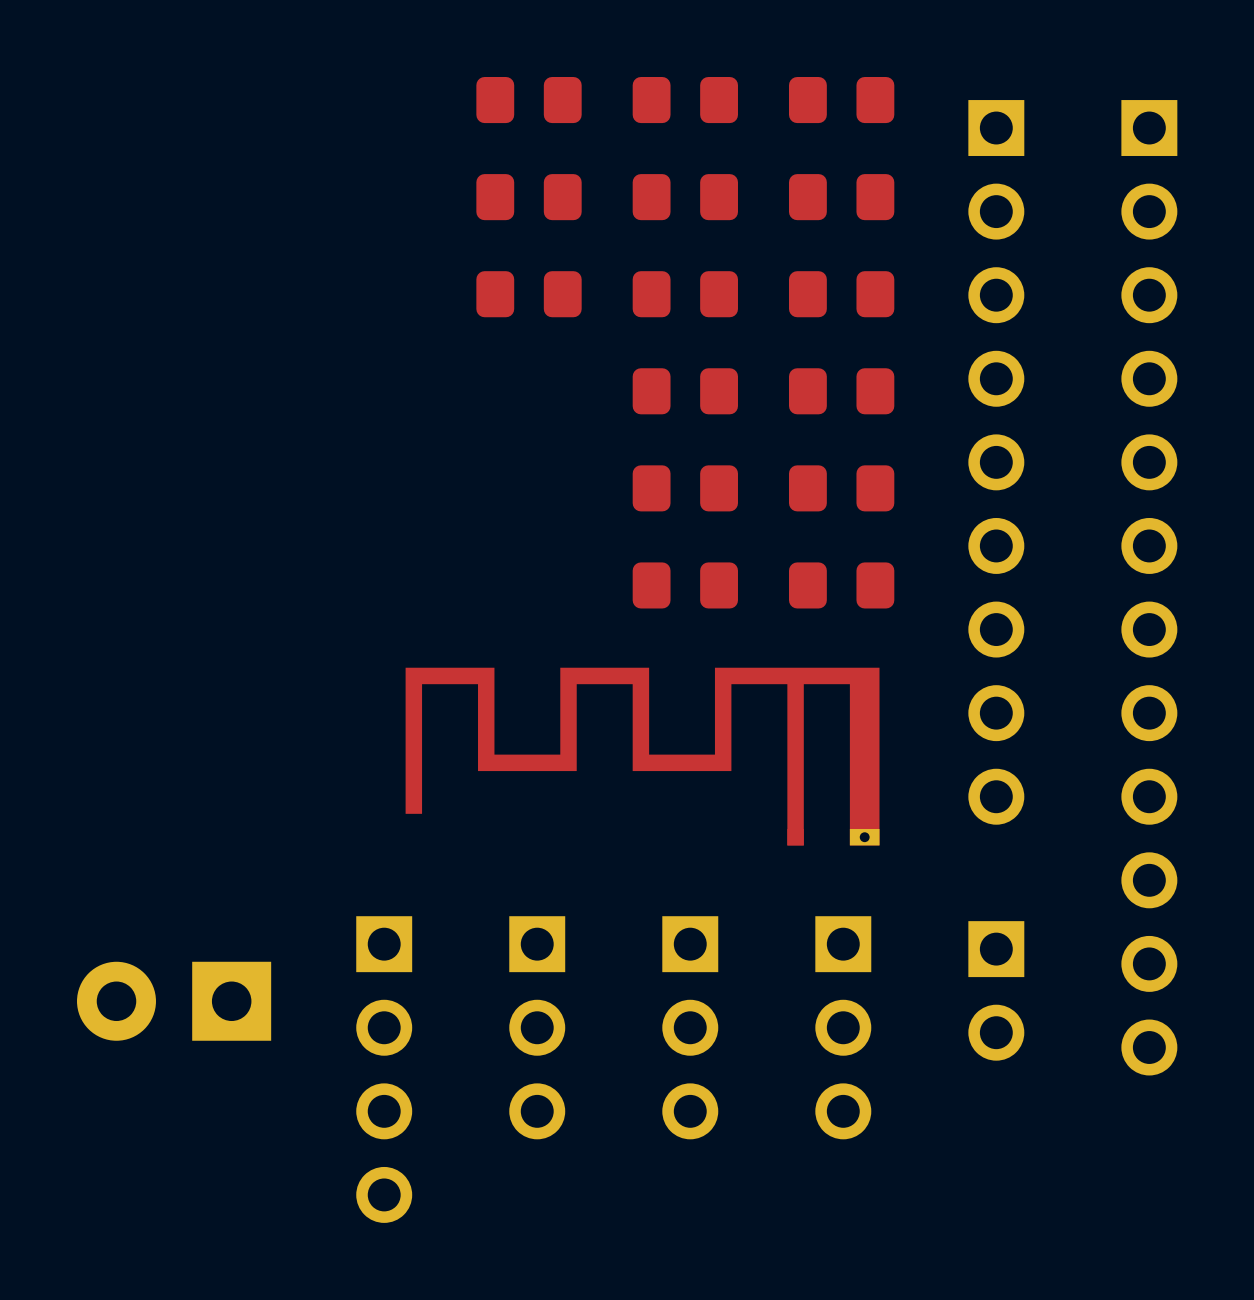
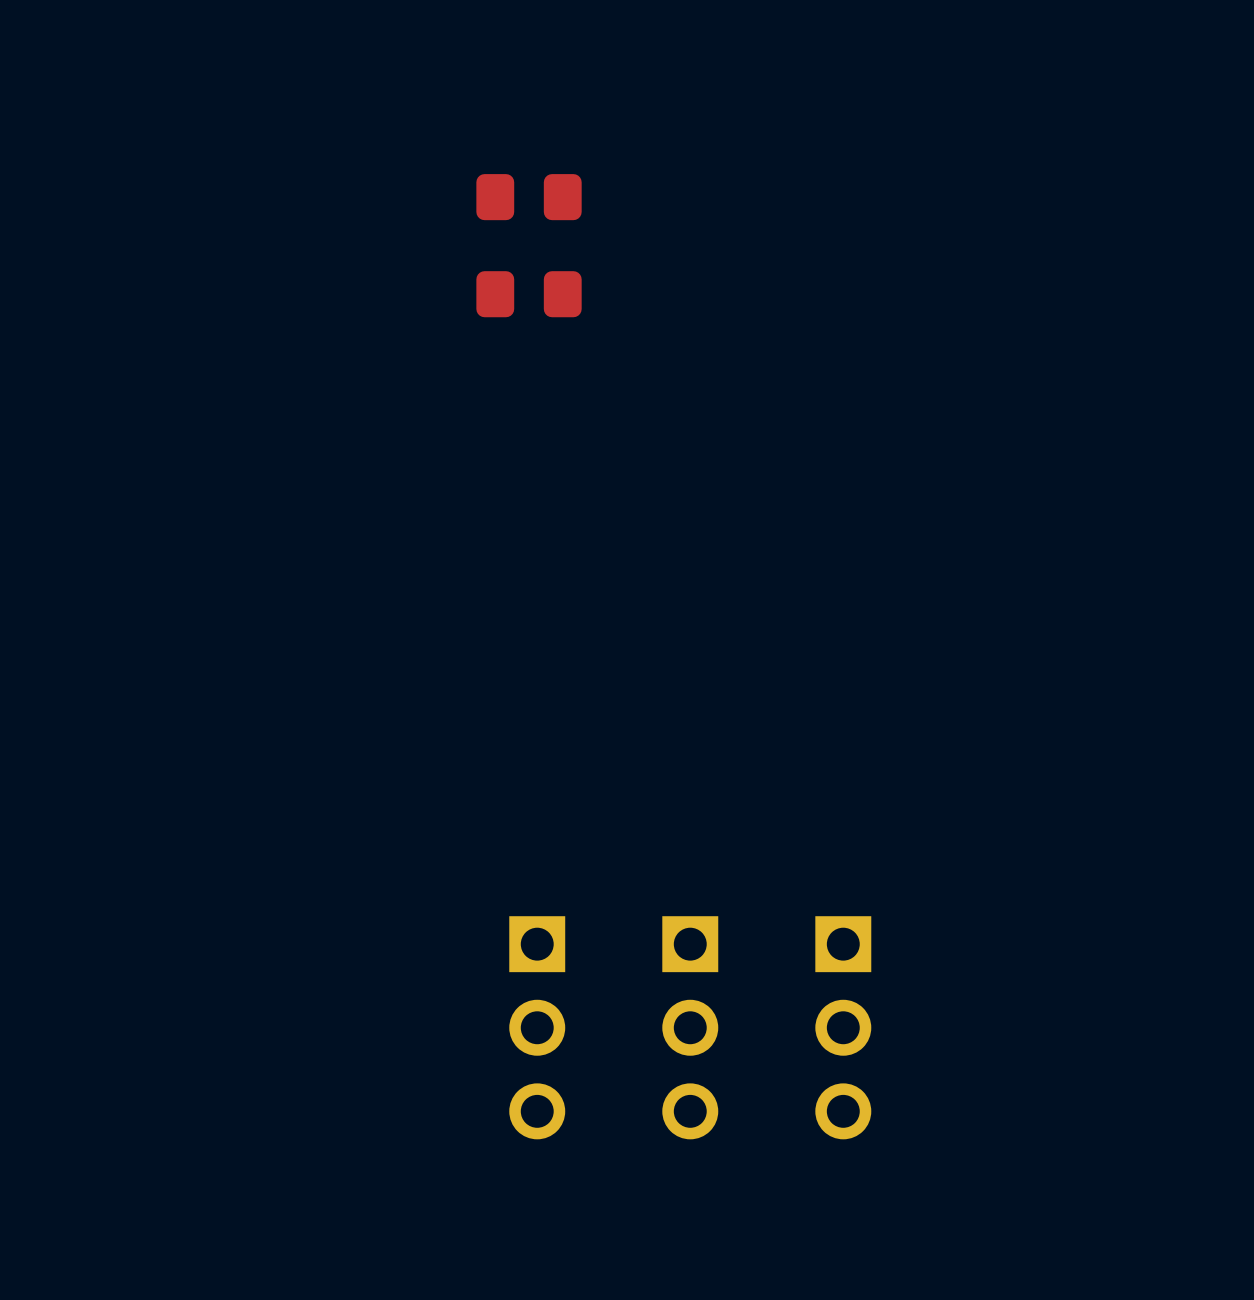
part: (529, 100) -> none
part: (685, 100) -> none
part: (841, 100) -> none
part: (685, 197) -> none
part: (841, 197) -> none
part: (685, 294) -> none
part: (841, 294) -> none
part: (685, 391) -> none
part: (841, 391) -> none
part: (996, 462) -> none
part: (685, 488) -> none
part: (841, 488) -> none
part: (685, 585) -> none
part: (841, 585) -> none
part: (1149, 587) -> none
part: (642, 756) -> none
part: (996, 990) -> none
part: (174, 1001) -> none
part: (384, 1069) -> none

